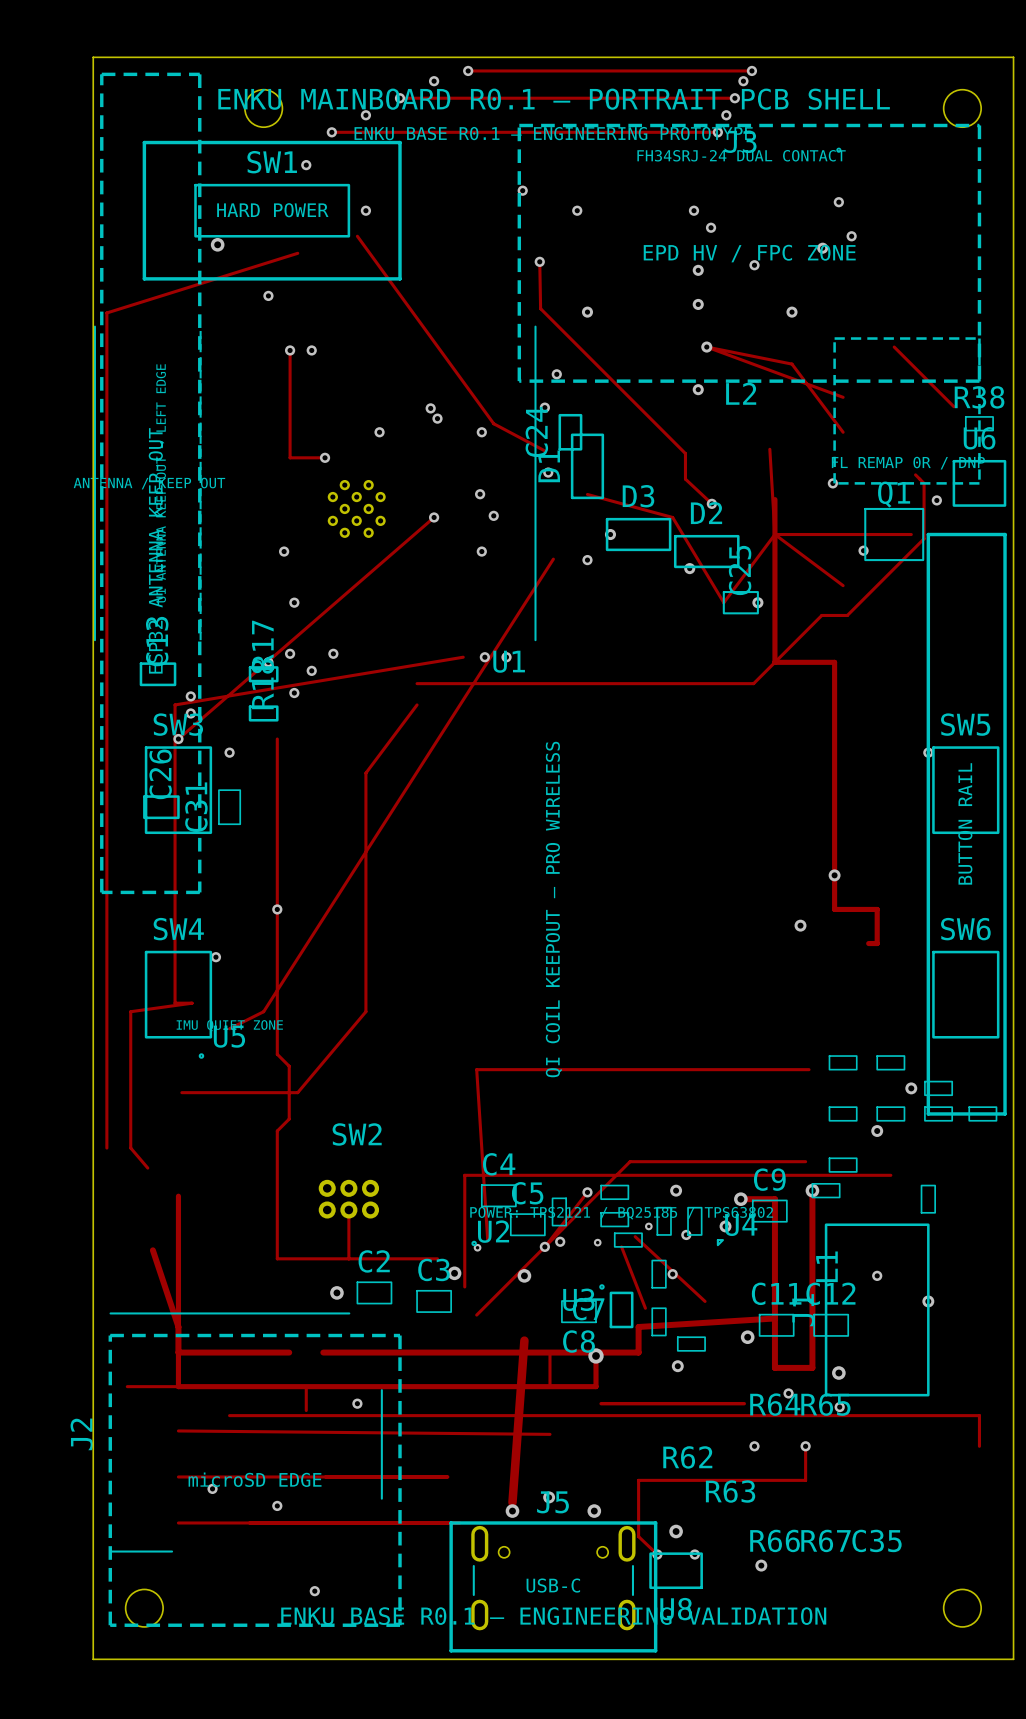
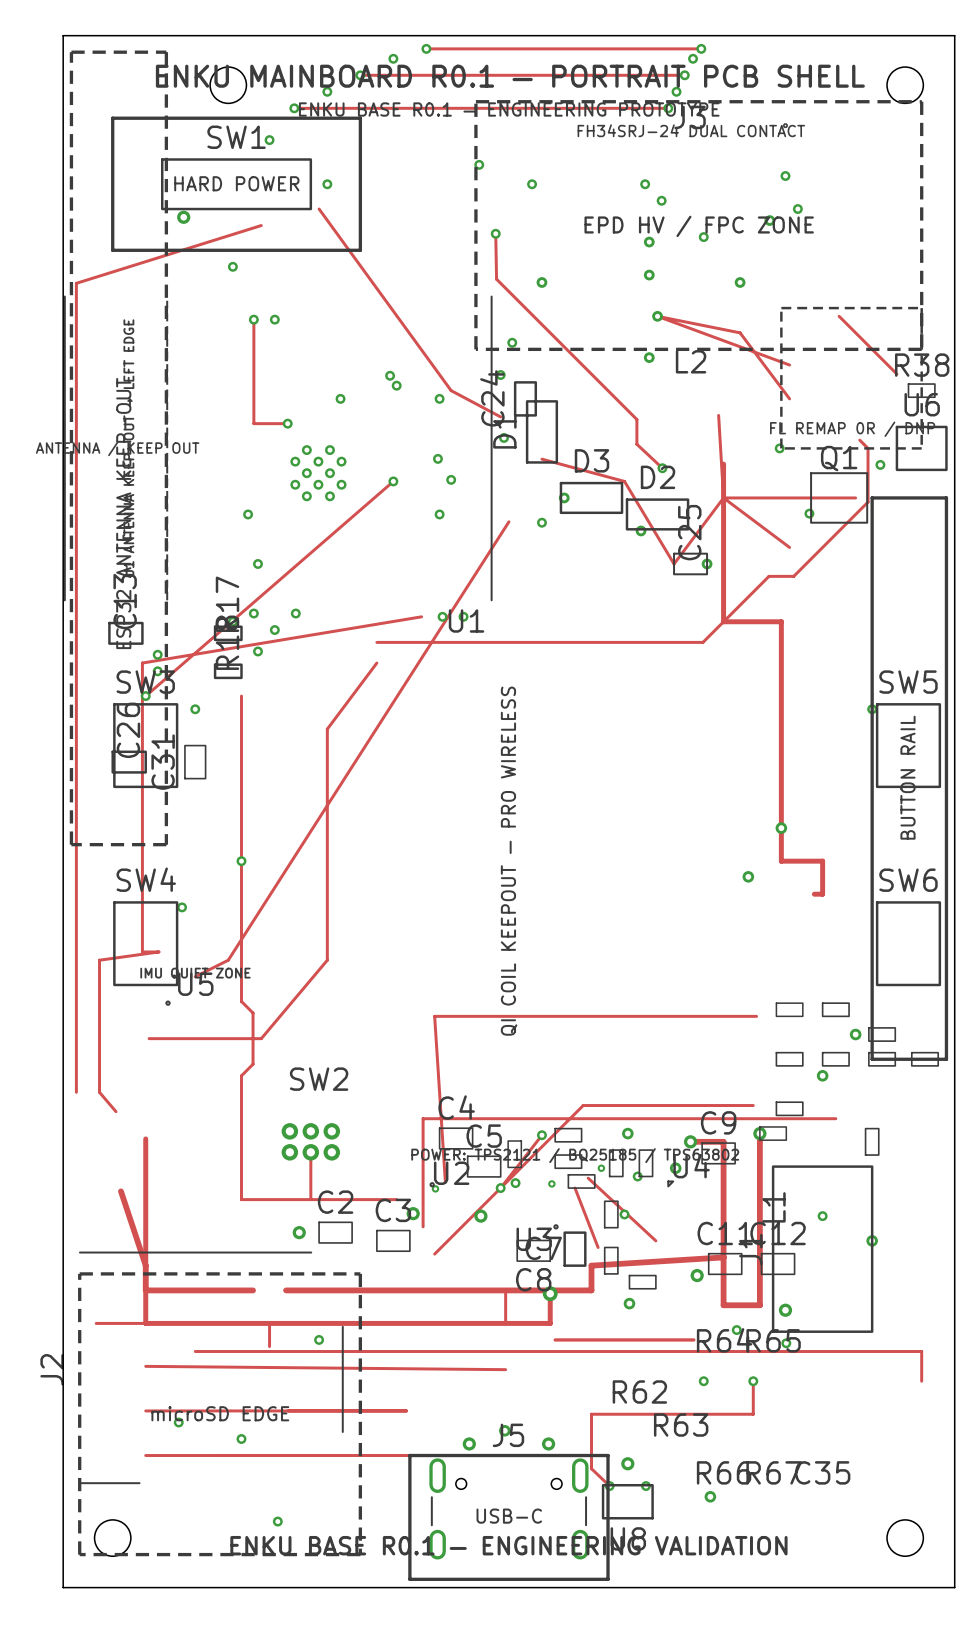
track: (524, 1340) (512, 1502) -> none

